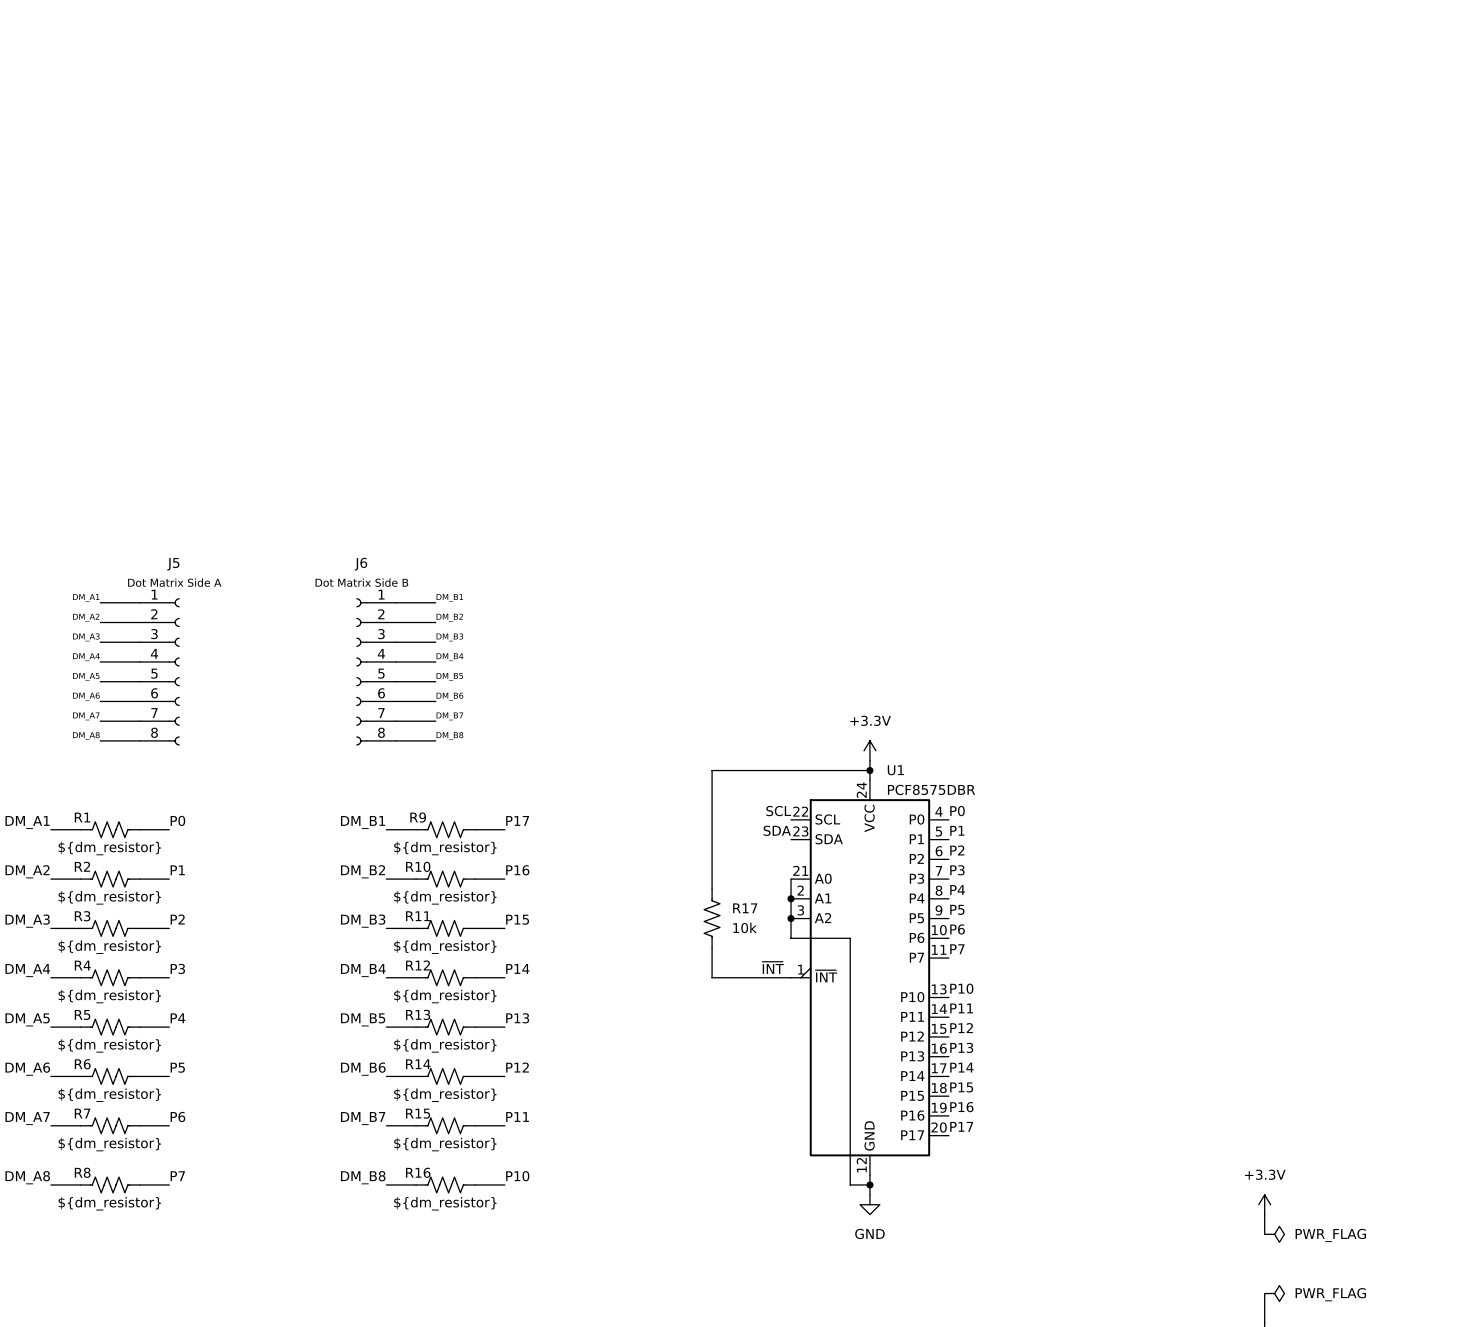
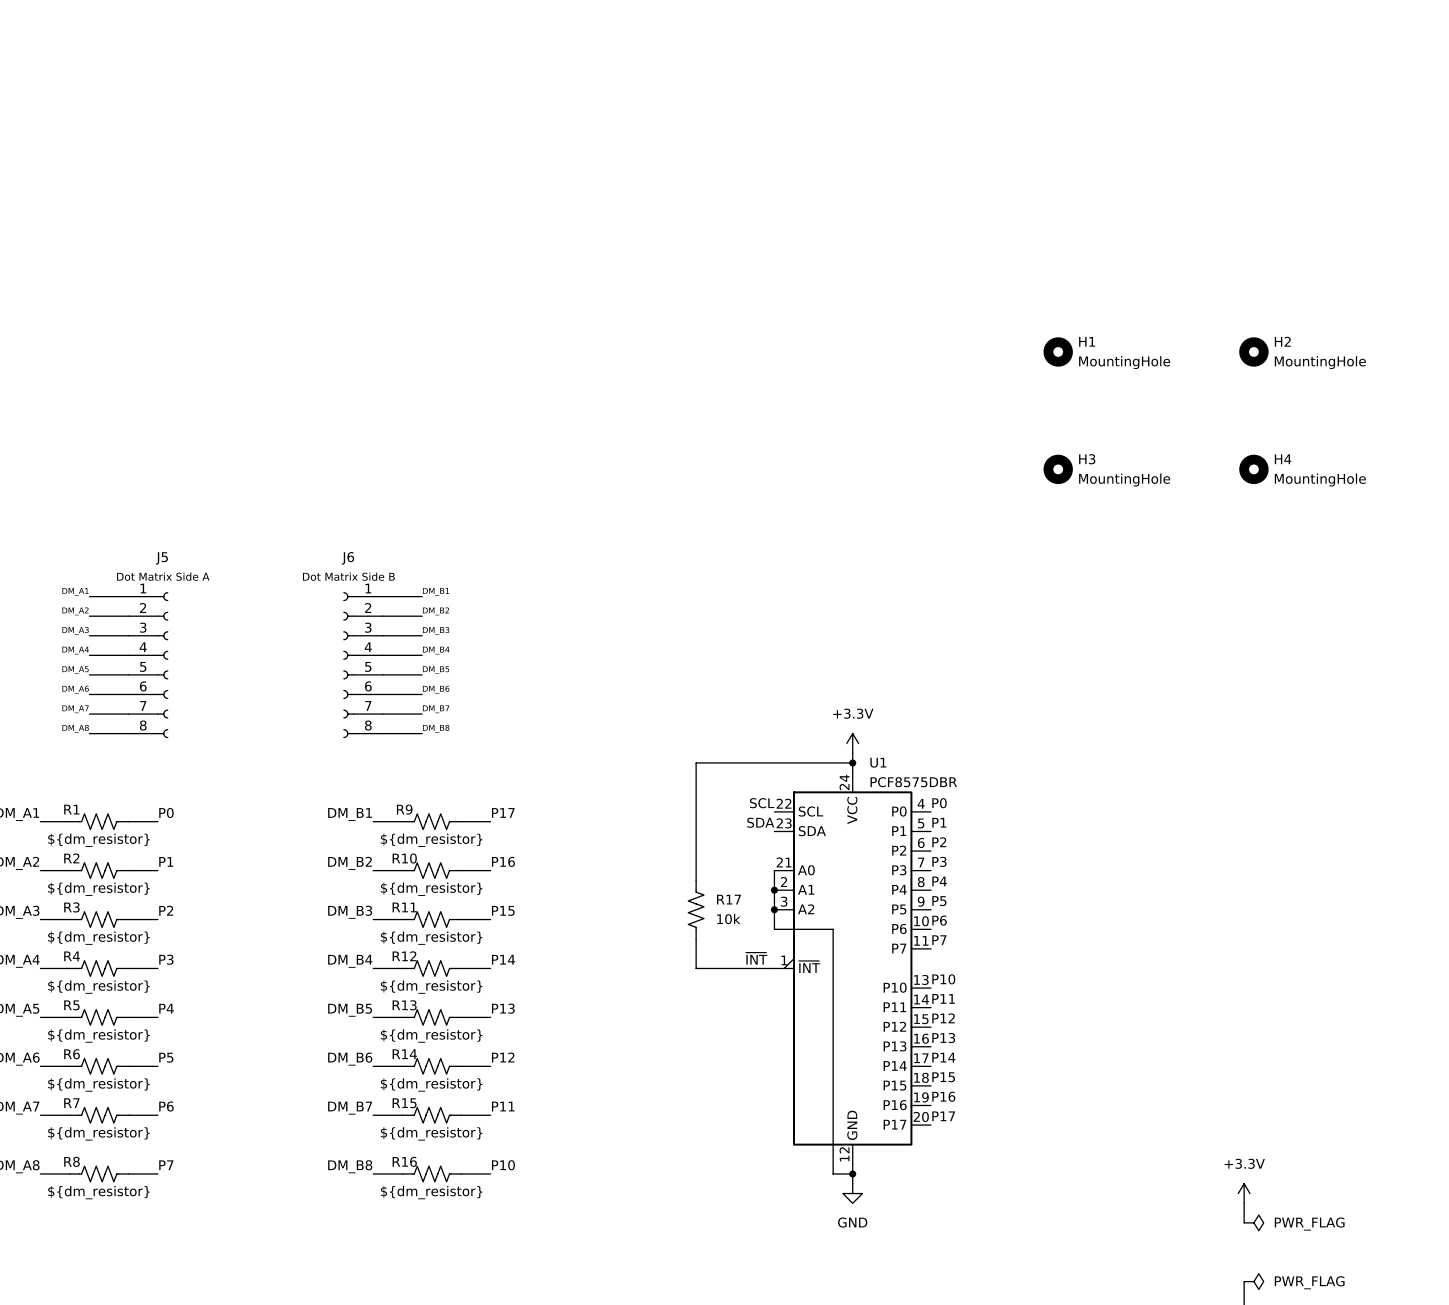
H1: none -> MountingHole (1058, 351)
H2: none -> MountingHole (1253, 351)
H3: none -> MountingHole (1058, 469)
H4: none -> MountingHole (1253, 469)

